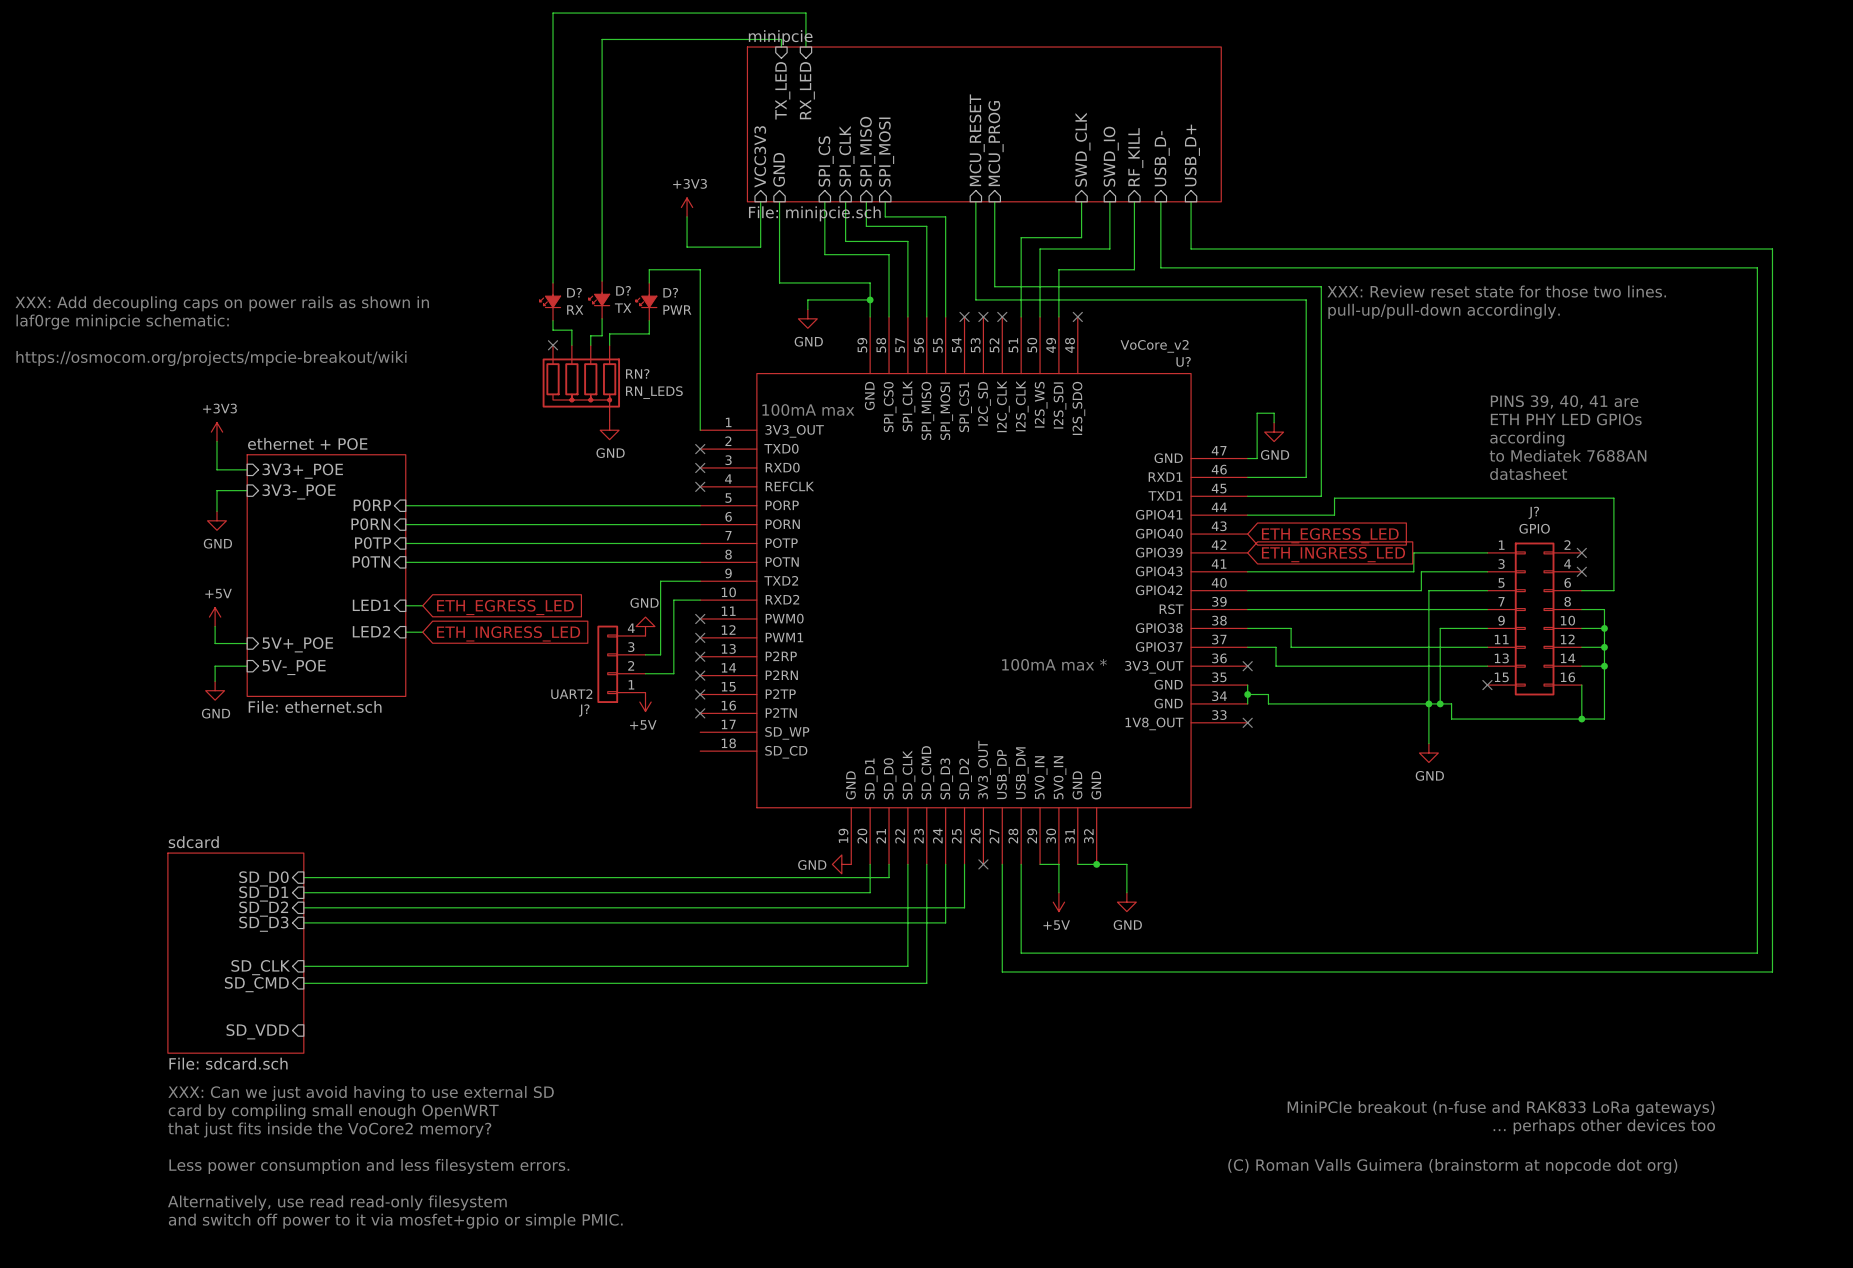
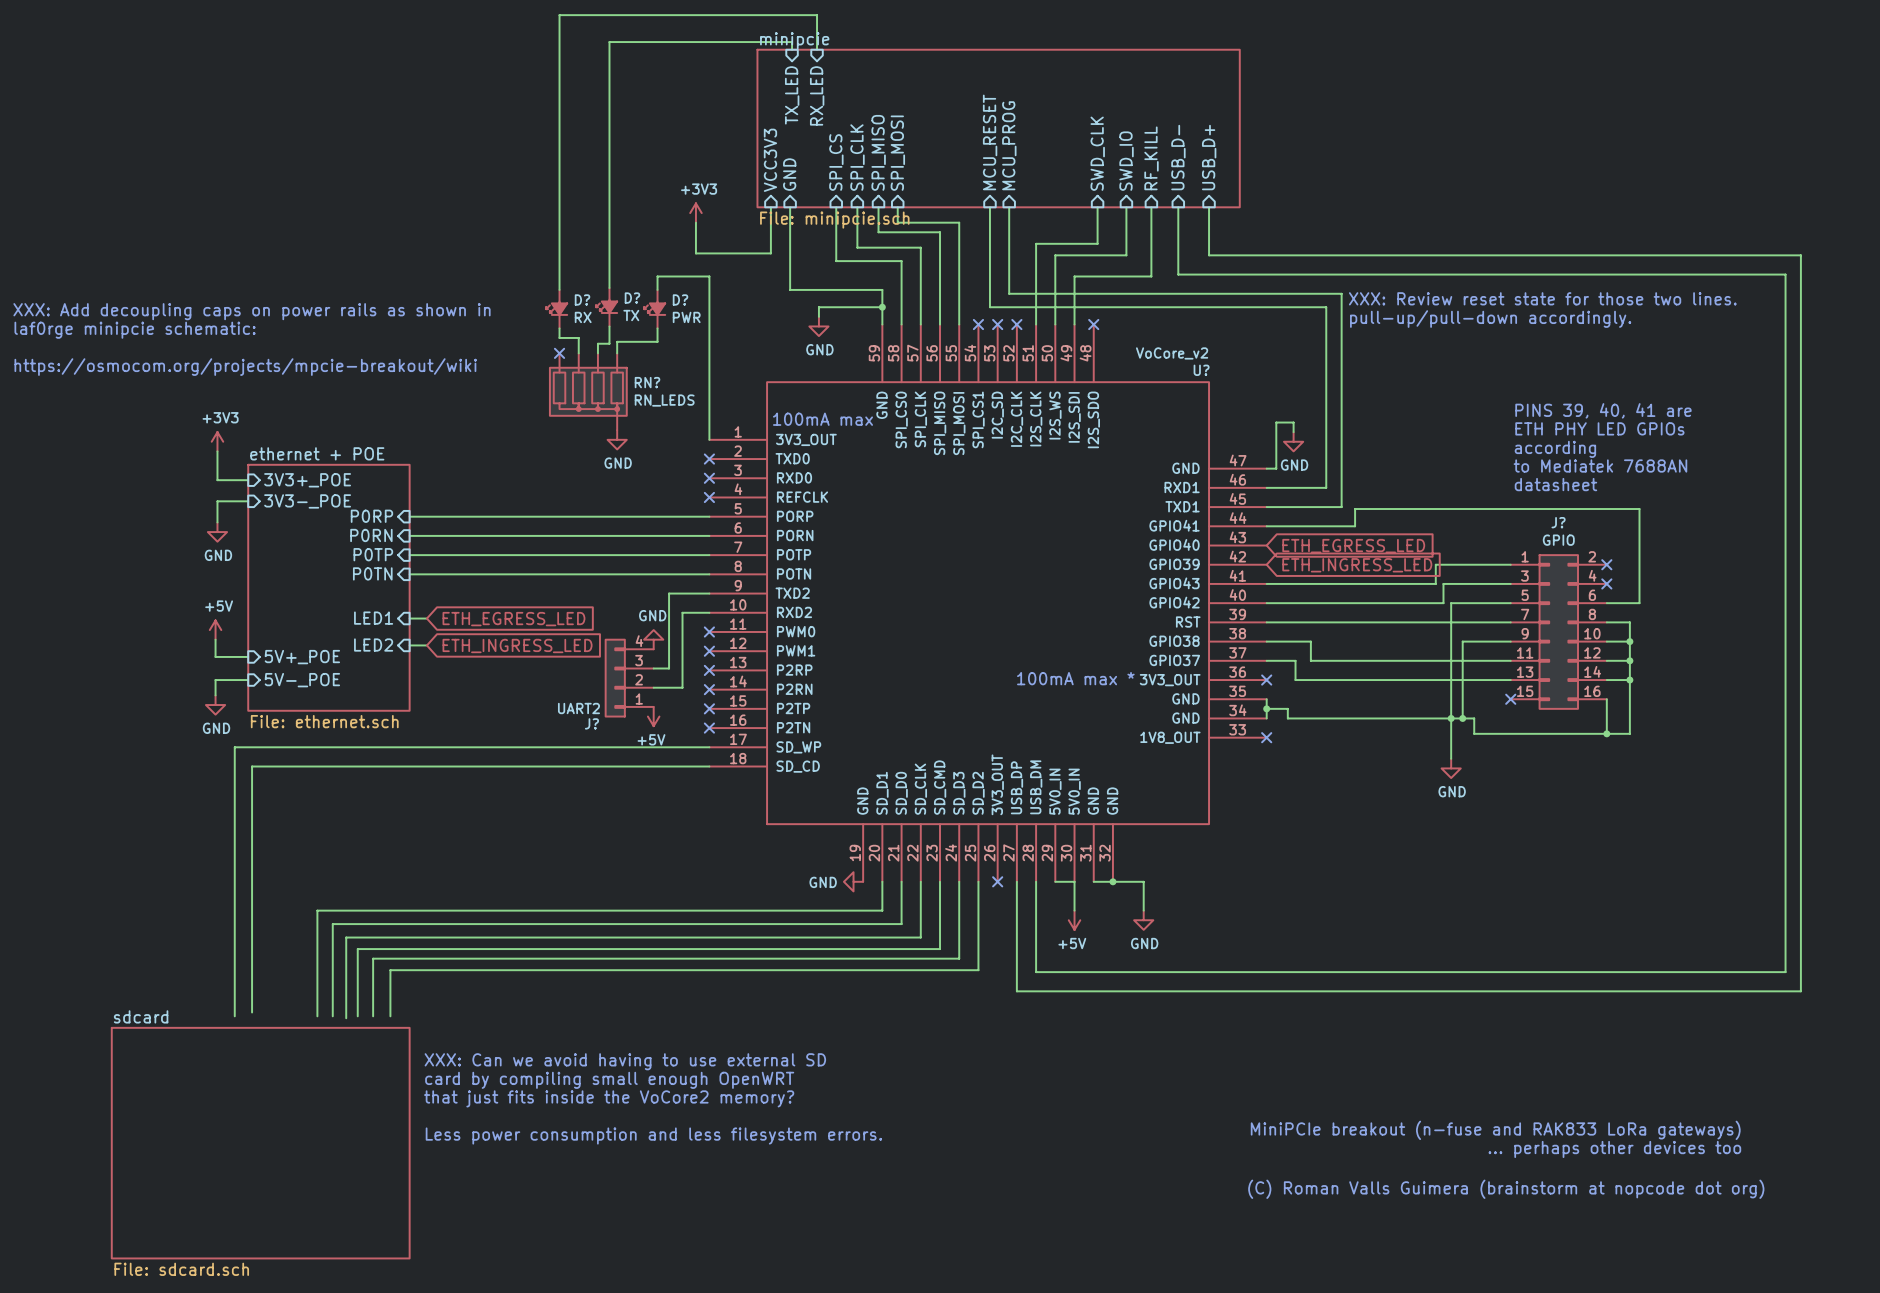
wire: none -> (709, 747) (234, 747) (234, 1016)
wire: none -> (709, 766) (252, 766) (252, 1012)
wire: (303, 877) (889, 877) -> (332, 1016) (332, 924) (901, 924) (901, 895)
sheet pin: SD_D0 (263, 878) -> none
wire: (303, 892) (315, 892) -> (317, 1016) (317, 910)
sheet pin: SD_D1 (263, 894) -> none
wire: (303, 907) (964, 907) -> (390, 1016) (390, 970) (978, 970) (978, 926)
sheet pin: SD_D2 (263, 909) -> none
wire: (907, 919) (907, 966) (303, 966) -> (920, 937) (346, 937) (346, 1018)
wire: (303, 922) (945, 922) -> (373, 1016) (373, 958) (959, 958) (959, 941)
sheet pin: SD_D3 (263, 924) -> none
wire: (926, 930) (926, 983) (303, 983) -> (940, 949) (357, 949) (357, 1016)
sheet sdcard: File: sdcard.sch (235, 953) -> none
sheet pin: SD_CLK (260, 967) -> none
sheet pin: SD_CMD (256, 984) -> none
sheet pin: SD_VDD (257, 1031) -> none
text: none -> XXX: Can we avoid having to use external SD (625, 1061)
text: none -> card by compiling small enough OpenWRT (609, 1080)
text: none -> that just fits inside the VoCore2 memory? (609, 1098)
text: XXX: Can we just avoid having to use external SD (361, 1093) -> none
text: card by compiling small enough OpenWRT (333, 1111) -> none
text: none -> Less power consumption and less filesystem errors. (653, 1136)
sheet sdcard: none -> File: sdcard.sch (260, 1143)
text: that just fits inside the VoCore2 memory? (329, 1130) -> none
text: Less power consumption and less filesystem errors. (369, 1166) -> none
text: Alternatively, use read read-only filesystem (337, 1202) -> none
text: and switch off power to it via mosfet+gpio or simple PMIC. (395, 1221) -> none

